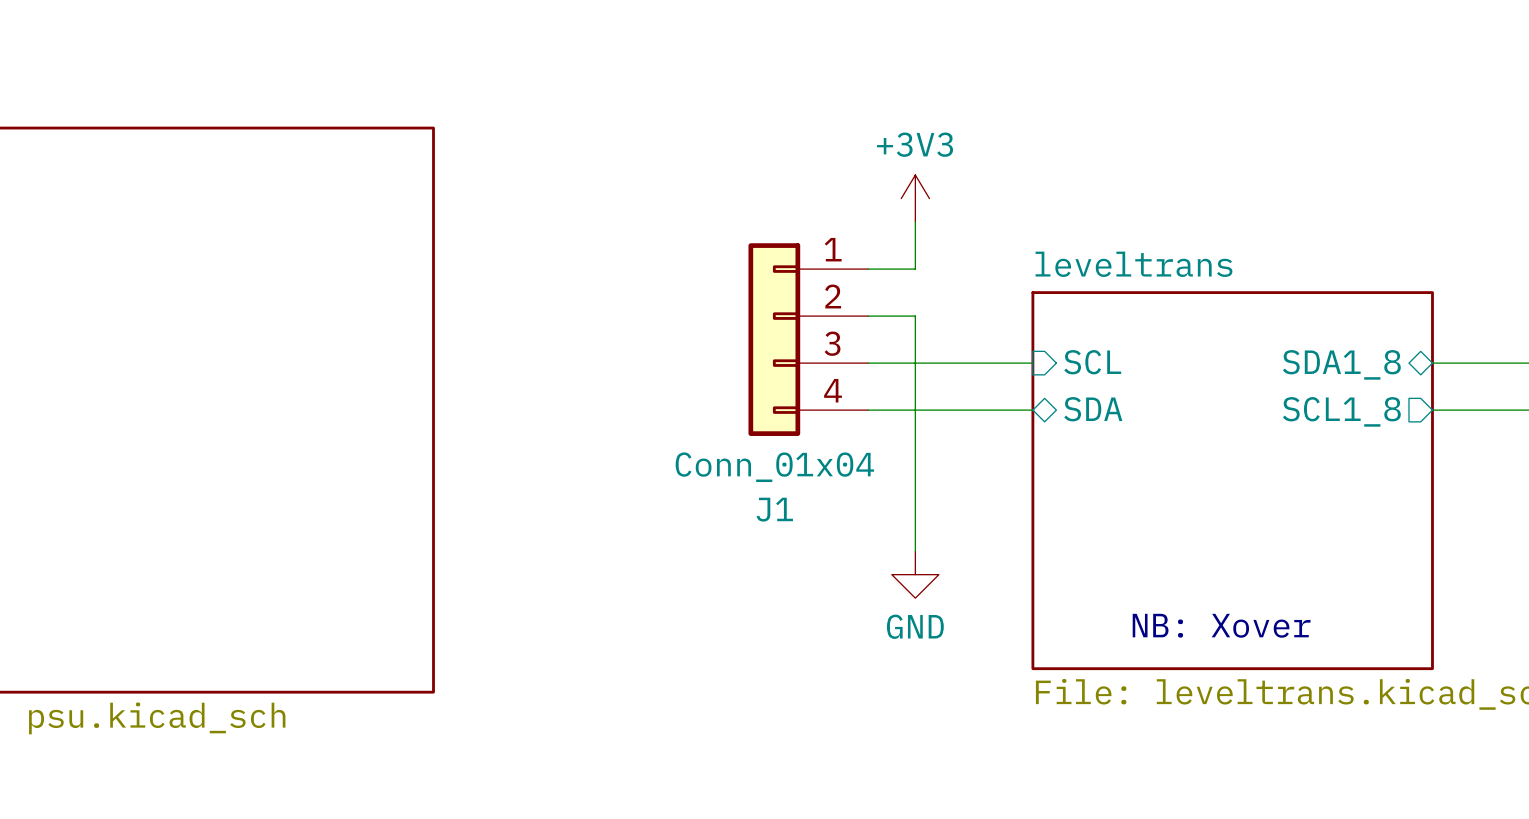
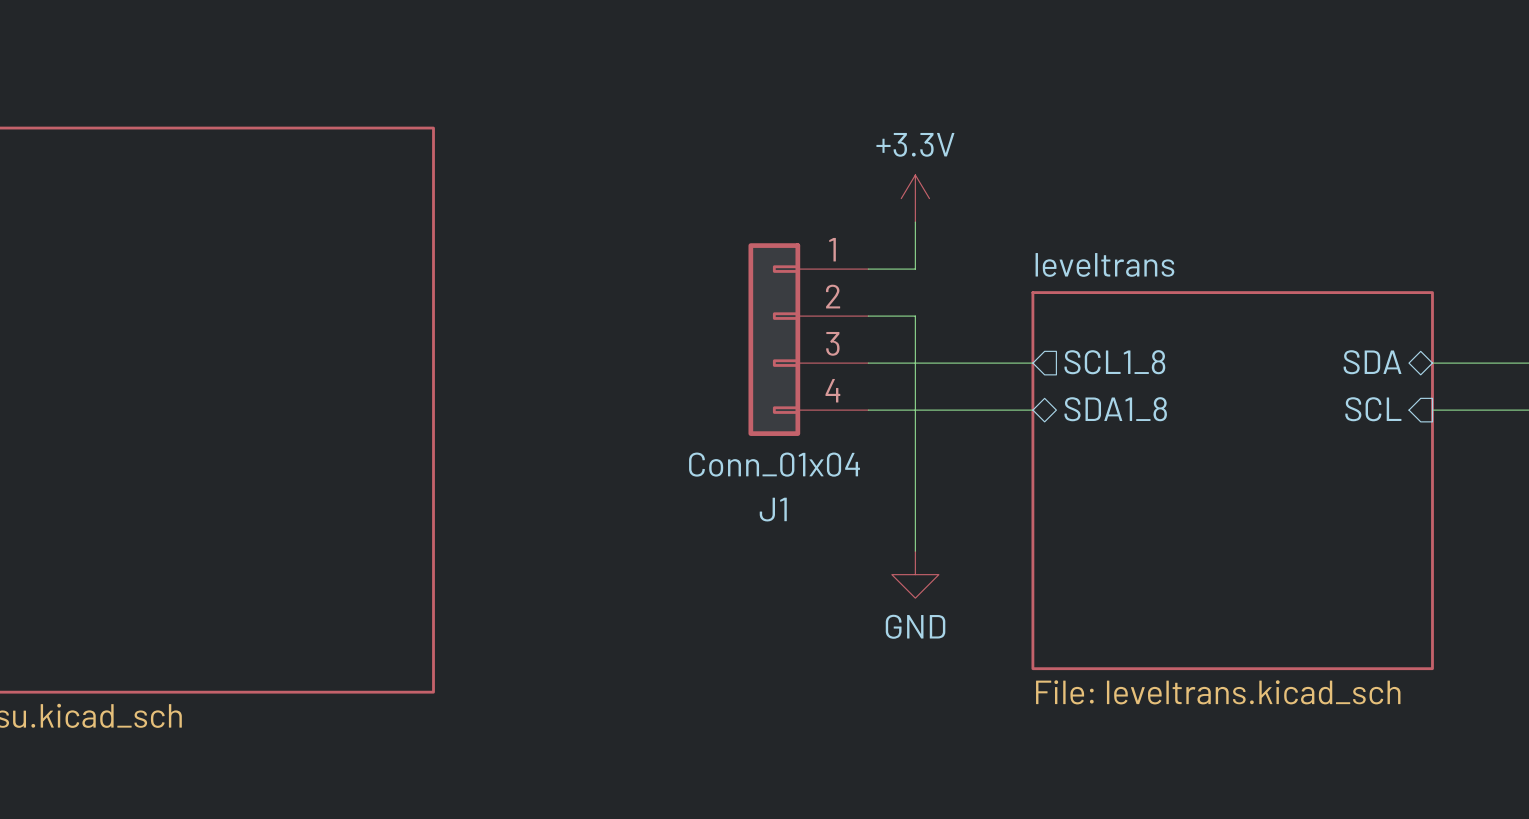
power symbol: +3V3 (915, 198) -> +3.3V (915, 198)
sheet pin shape: input (1092, 362) -> output (1114, 362)
sheet pin: SCL (1092, 362) -> SCL1_8 (1114, 362)
sheet pin: SDA1_8 (1341, 364) -> SDA (1372, 362)
sheet pin: SDA (1093, 409) -> SDA1_8 (1115, 409)
sheet pin shape: output (1341, 411) -> input (1373, 409)
sheet pin: SCL1_8 (1341, 411) -> SCL (1373, 409)
text: NB: Xover (1221, 625) -> none

